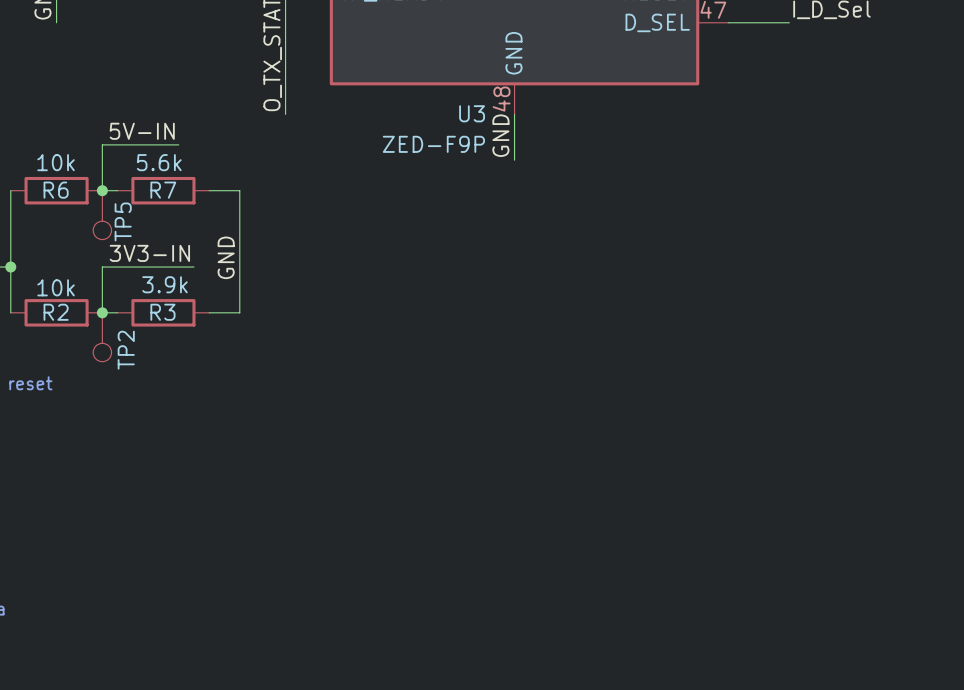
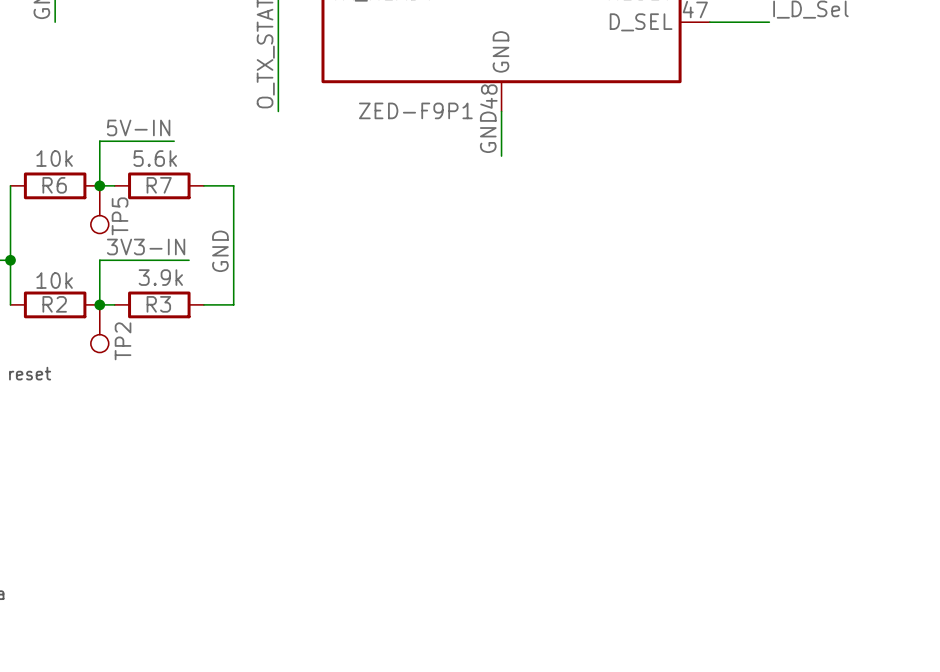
U3 name: U3 (472, 113) -> ZED-F9P1 (415, 110)
U3 value: ZED-F9P (433, 144) -> none

